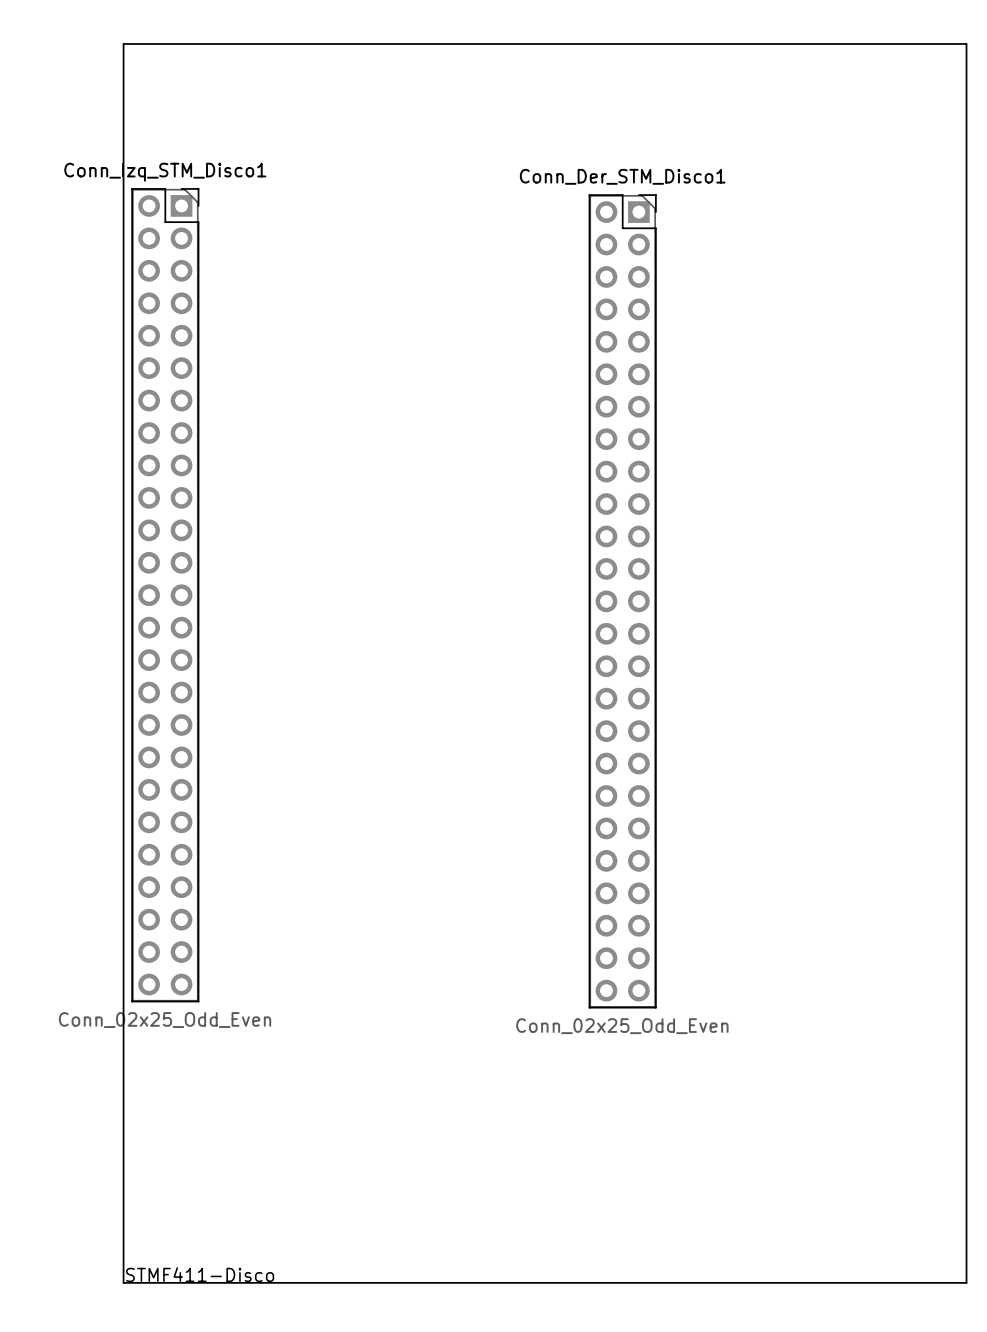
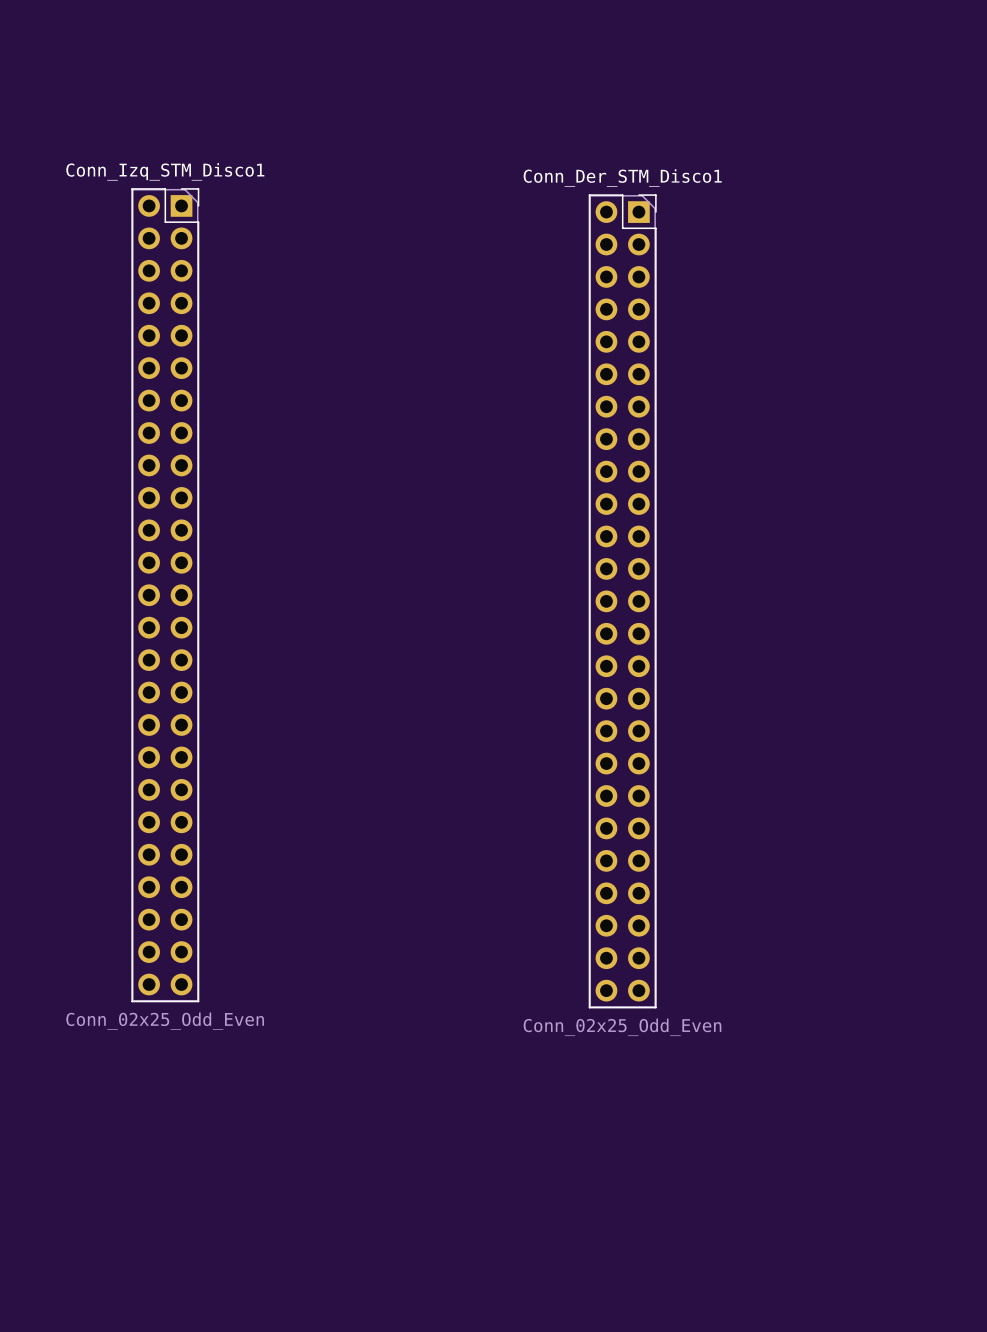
line: (123, 43) (966, 43) (966, 1282) (123, 1282) (123, 43) -> none
text: STMF411-Disco (200, 1274) -> none

